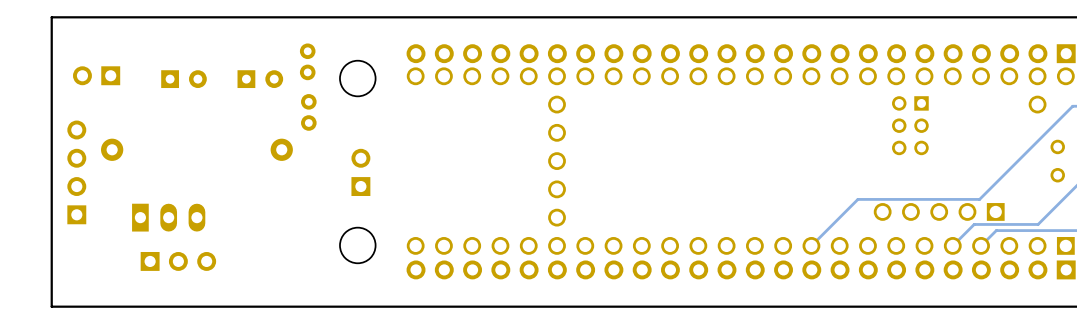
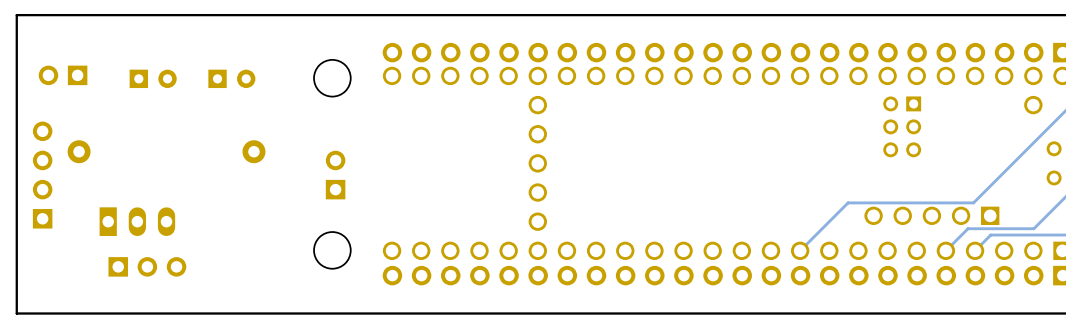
part: (307, 61) -> none
part: (308, 112) -> none

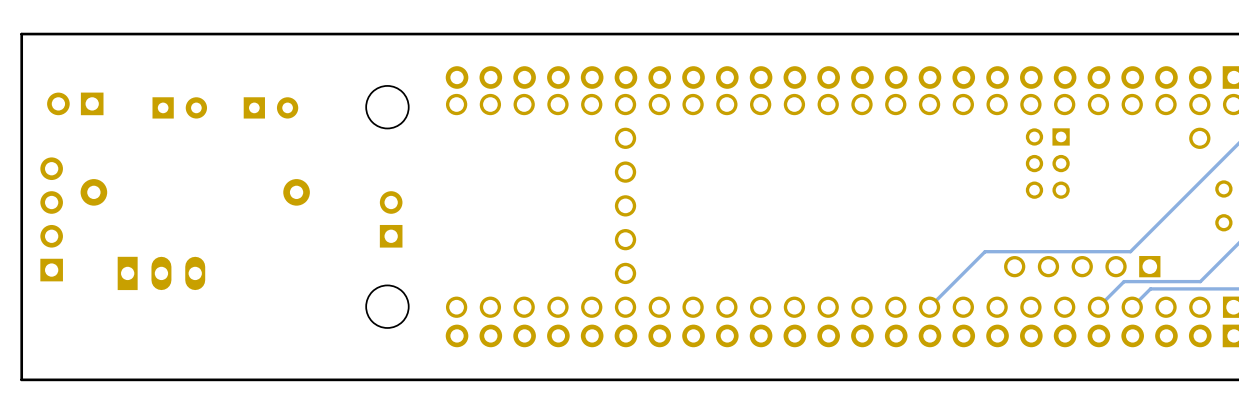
part: (147, 266) -> none

